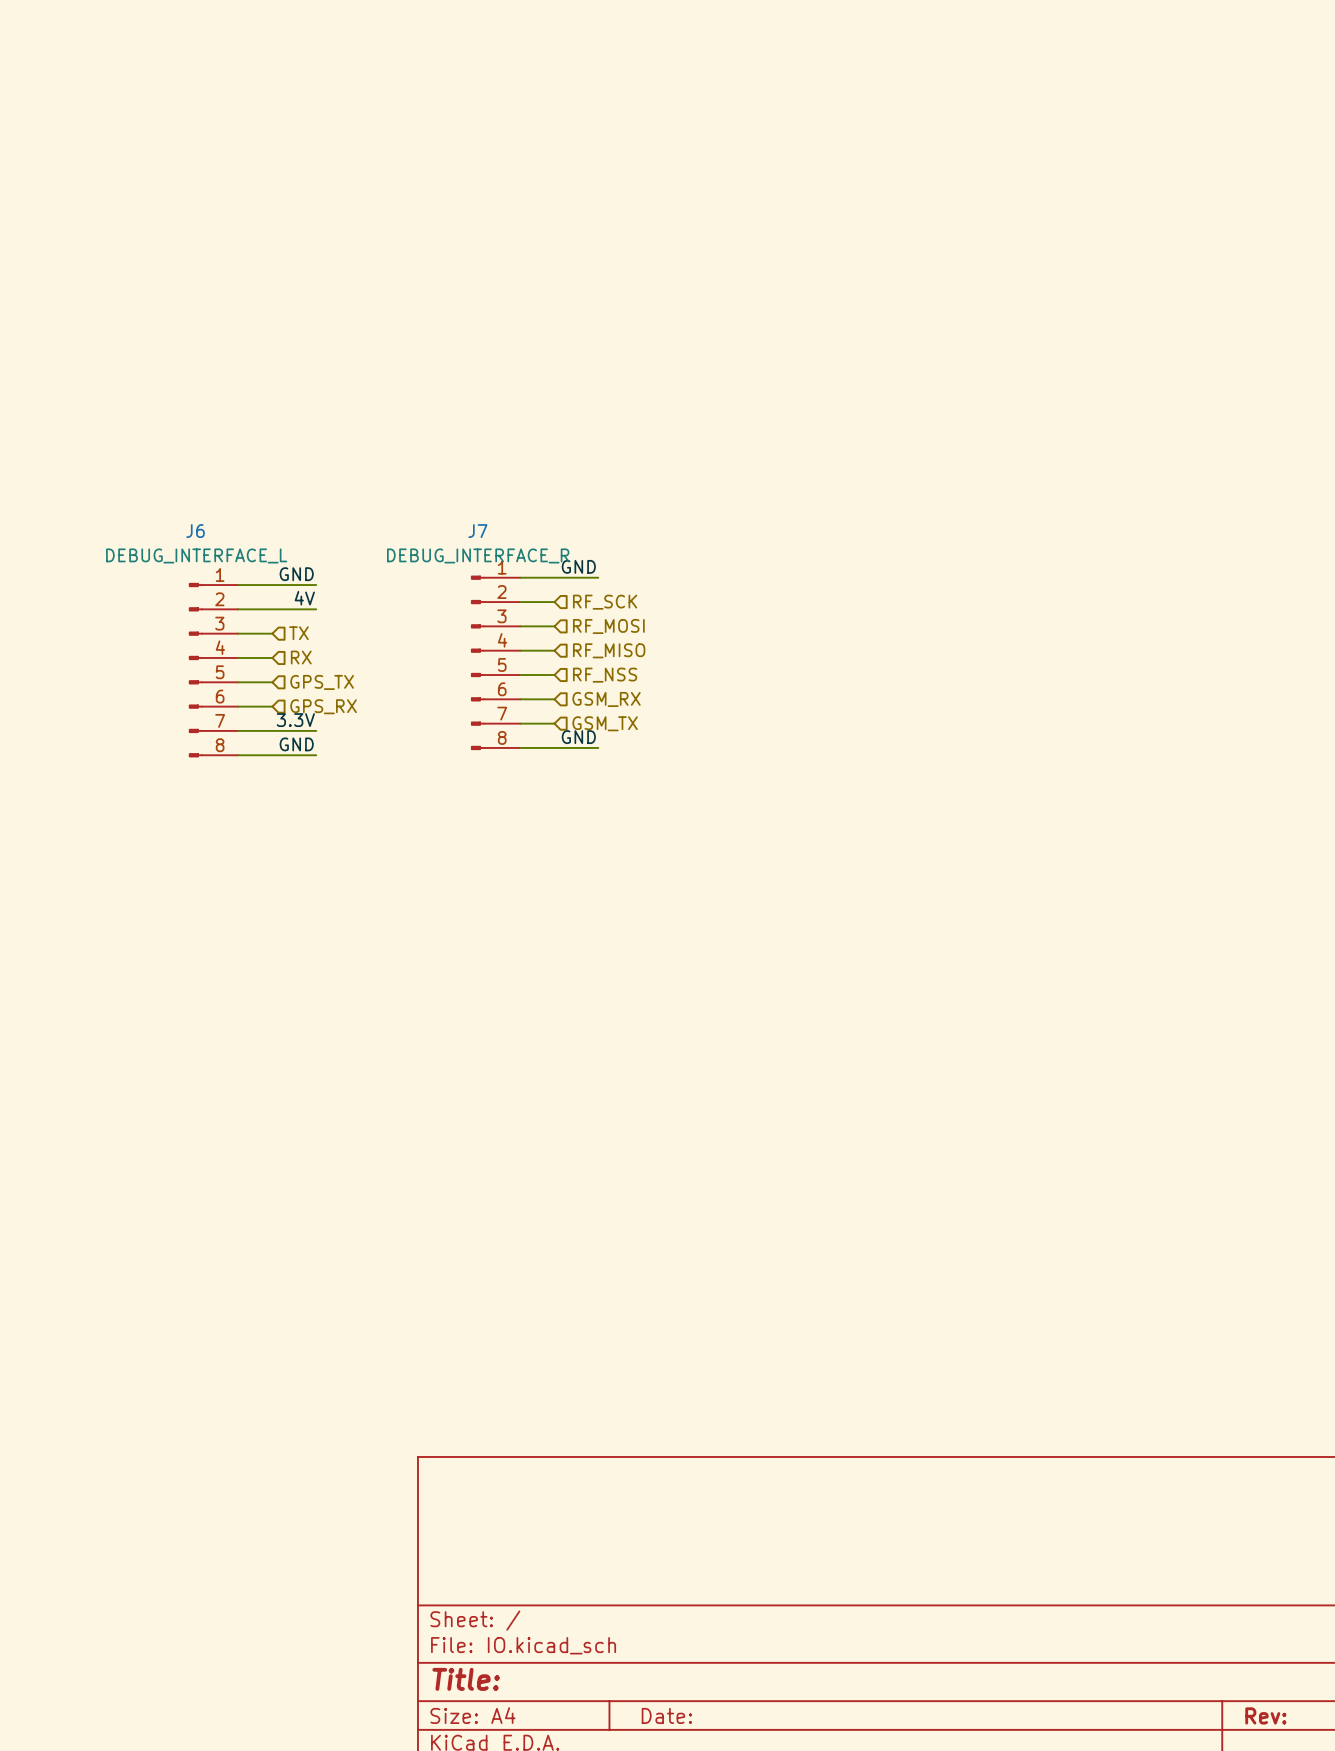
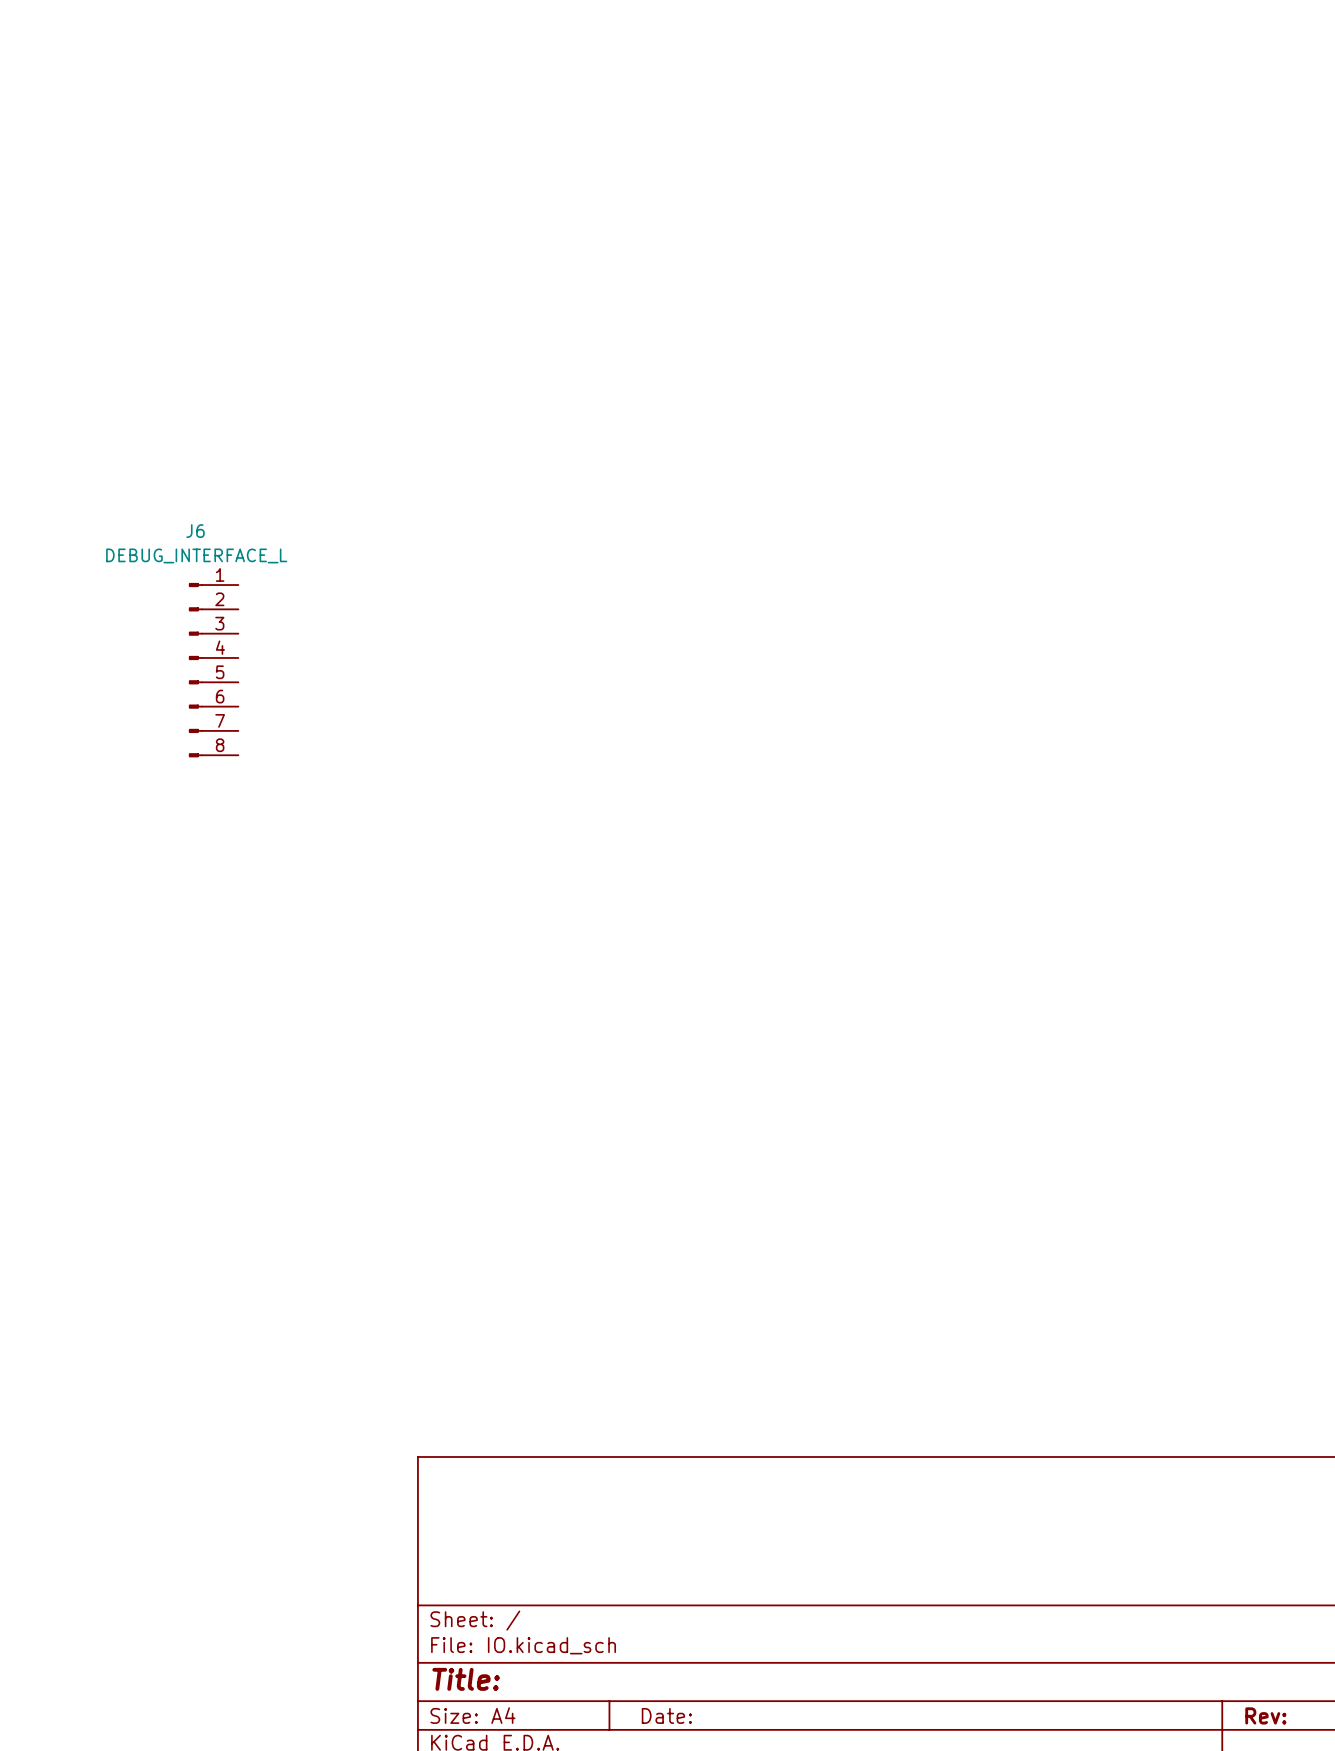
label: GND (578, 566) -> none
label: GND (296, 574) -> none
wire: (520, 577) (598, 577) -> none
wire: (238, 585) (316, 585) -> none
label: 4V (304, 598) -> none
wire: (520, 602) (554, 602) -> none
hierarchical label: RF_SCK (605, 602) -> none
wire: (238, 609) (316, 609) -> none
wire: (520, 626) (554, 626) -> none
hierarchical label: RF_MOSI (608, 626) -> none
wire: (238, 633) (272, 633) -> none
hierarchical label: TX (298, 633) -> none
wire: (520, 650) (554, 650) -> none
hierarchical label: RF_MISO (609, 650) -> none
wire: (238, 657) (272, 657) -> none
hierarchical label: RX (301, 657) -> none
J7: DEBUG_INTERFACE_R (495, 662) -> none
wire: (520, 675) (554, 675) -> none
hierarchical label: RF_NSS (605, 675) -> none
wire: (238, 682) (272, 682) -> none
hierarchical label: GPS_TX (322, 682) -> none
wire: (520, 699) (554, 699) -> none
hierarchical label: GSM_RX (606, 699) -> none
wire: (238, 706) (272, 706) -> none
hierarchical label: GPS_RX (323, 706) -> none
label: 3.3V (295, 720) -> none
wire: (520, 723) (554, 723) -> none
hierarchical label: GSM_TX (605, 723) -> none
wire: (238, 730) (316, 730) -> none
label: GND (578, 737) -> none
label: GND (296, 744) -> none
wire: (520, 747) (598, 747) -> none
wire: (238, 755) (316, 755) -> none

